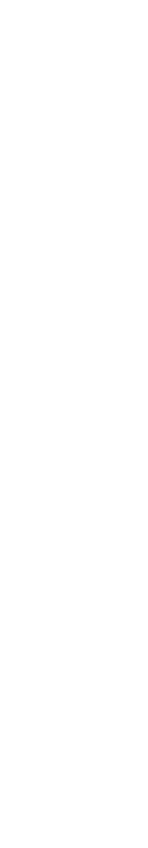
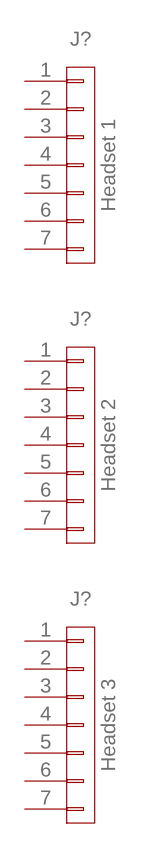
J?: none -> Headset 1 (59, 165)
J?: none -> Headset 2 (59, 445)
J?: none -> Headset 3 (59, 725)

